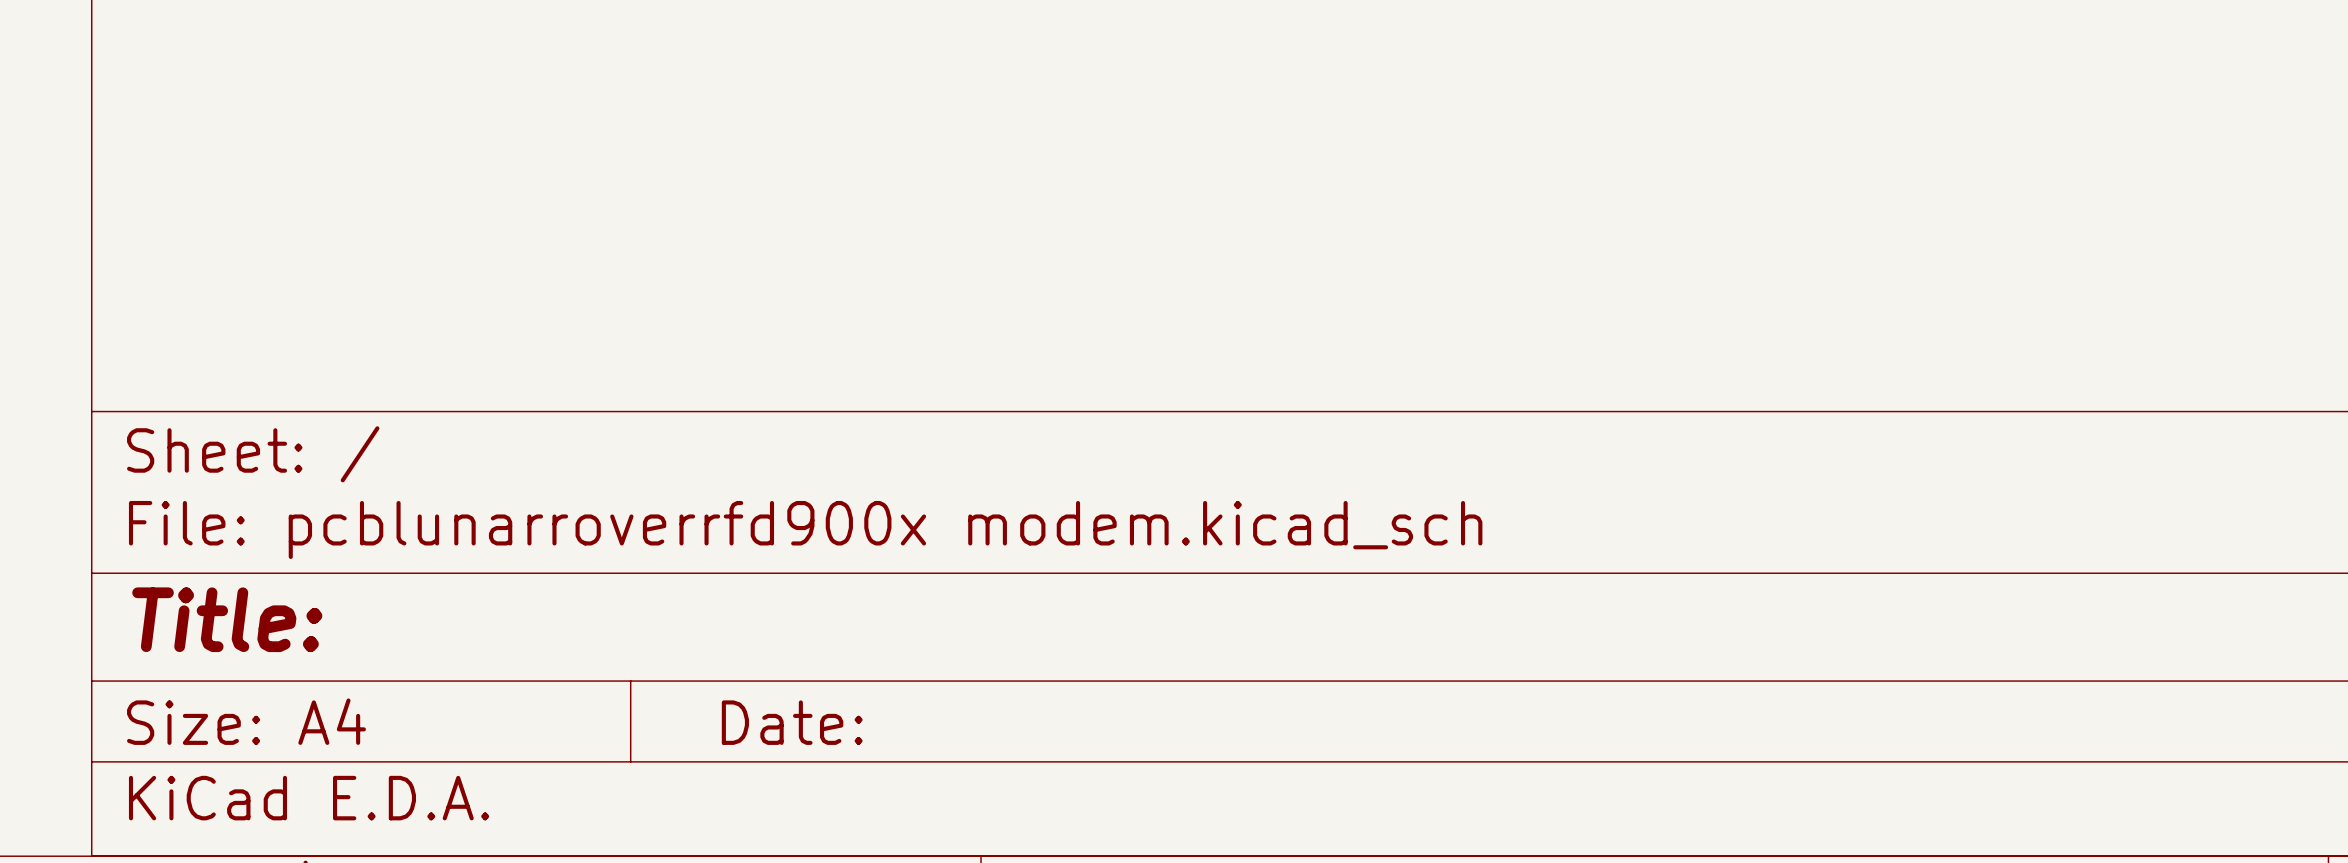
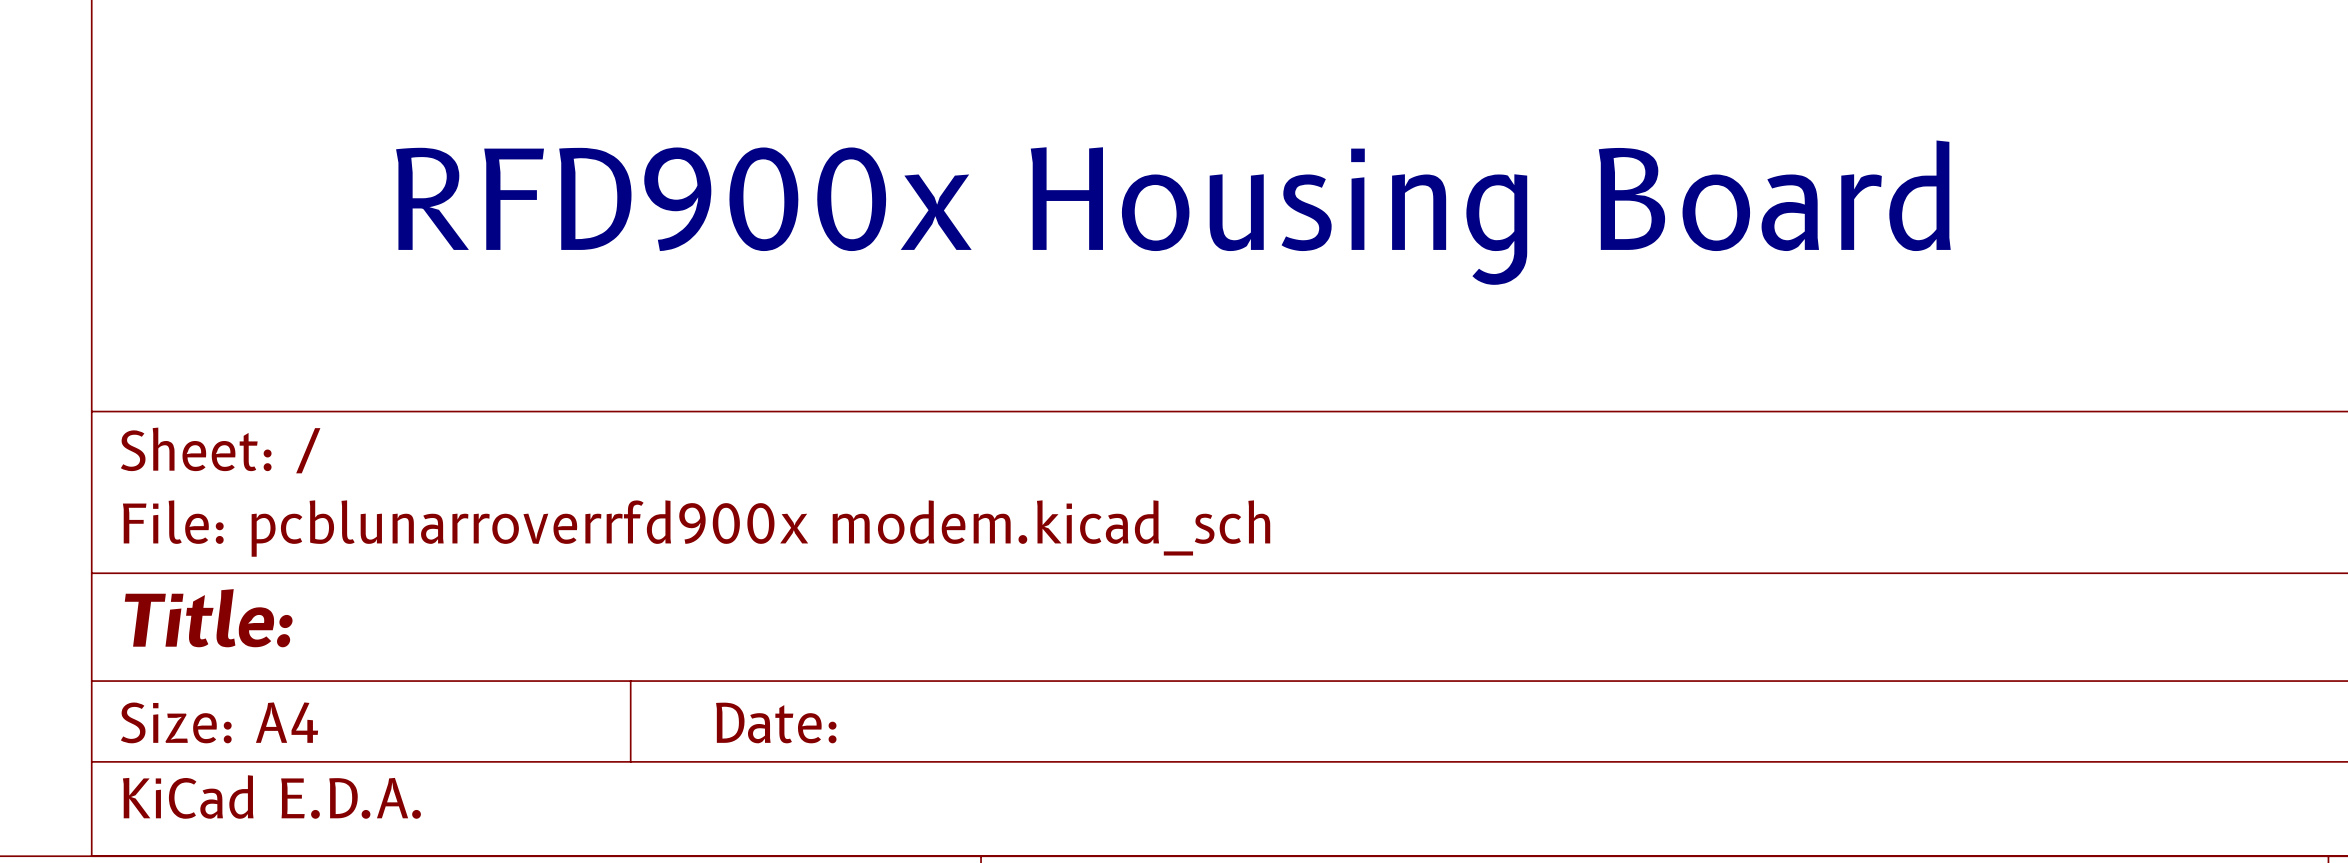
text: none -> RFD900x Housing Board (1173, 212)

